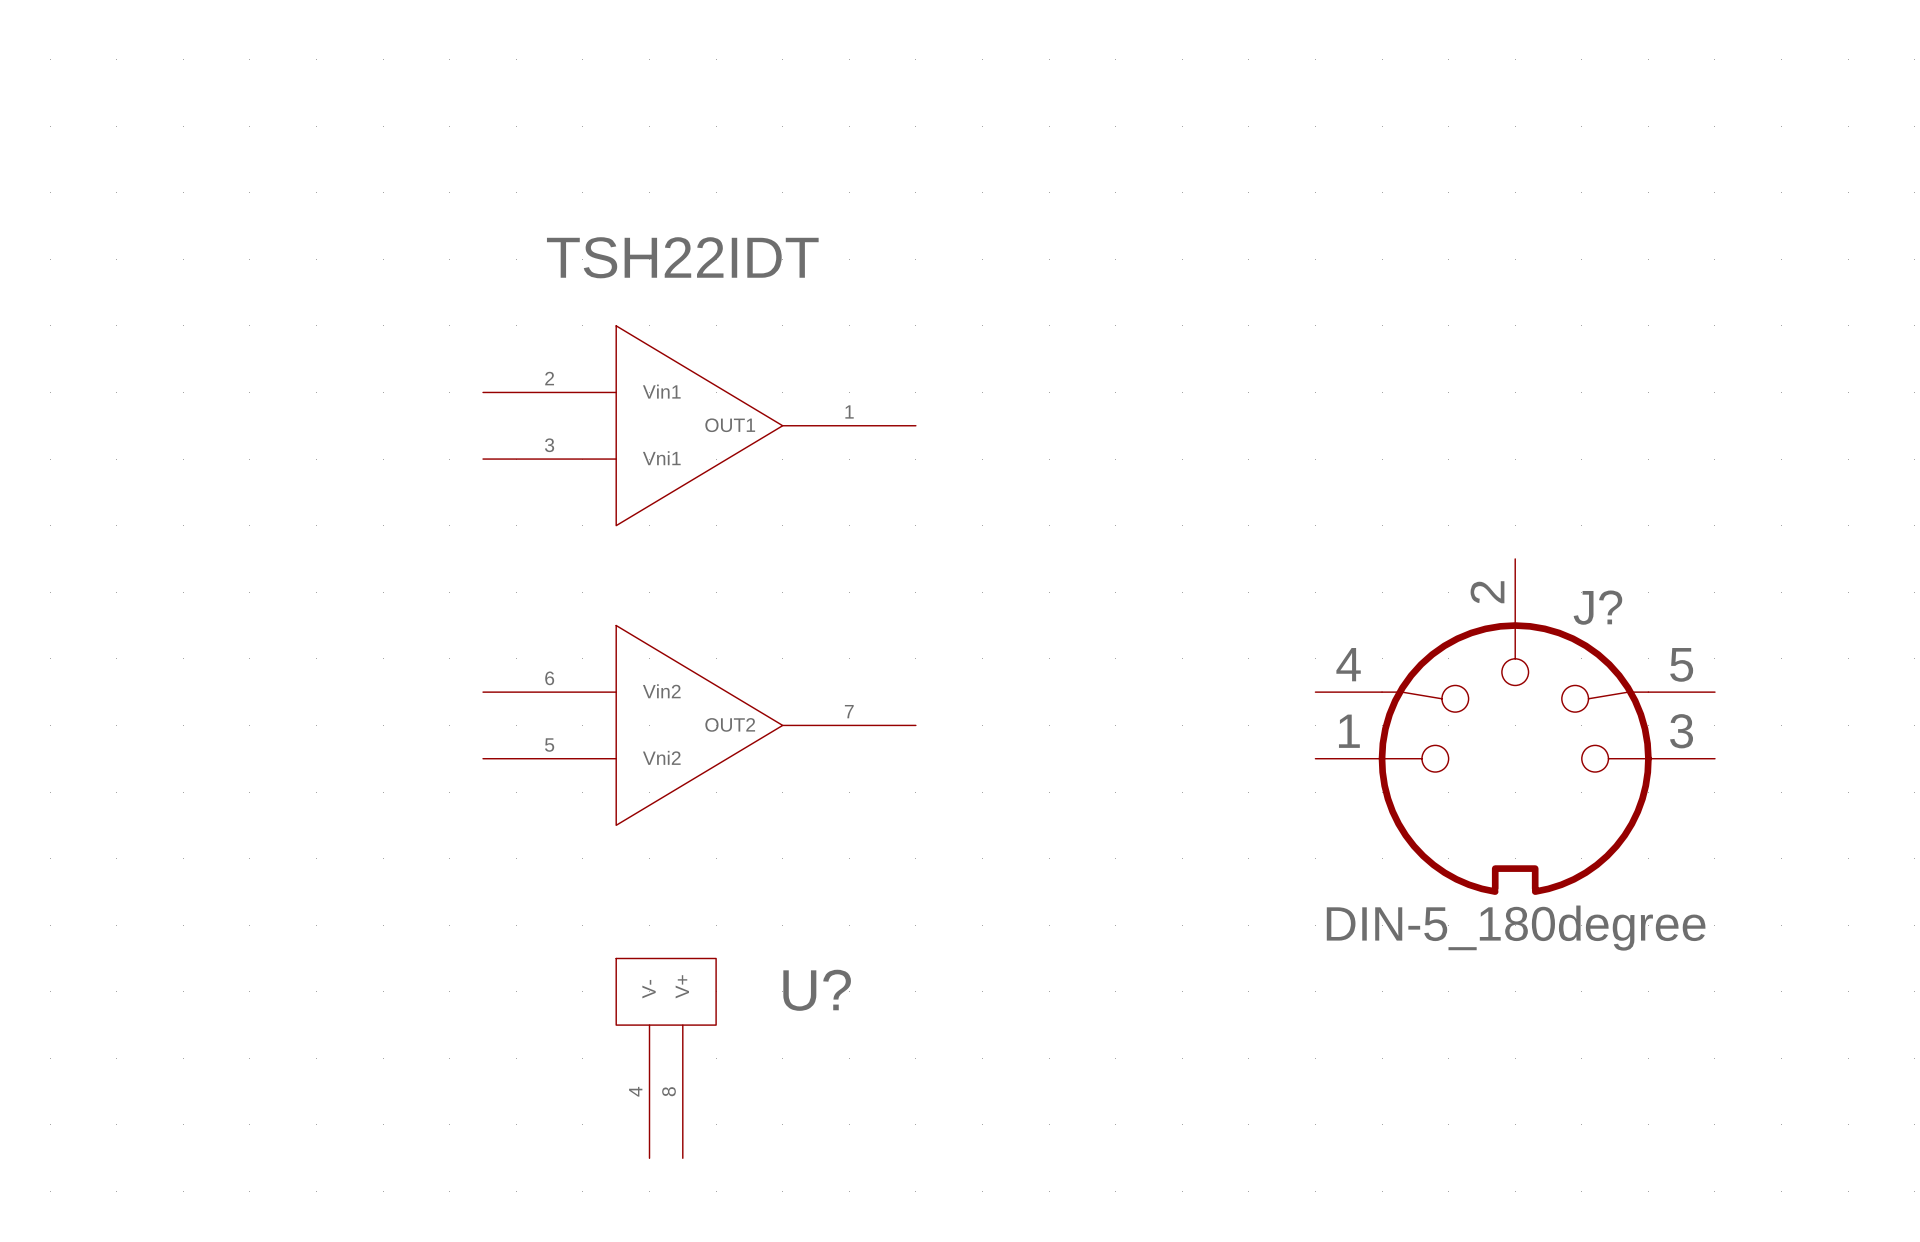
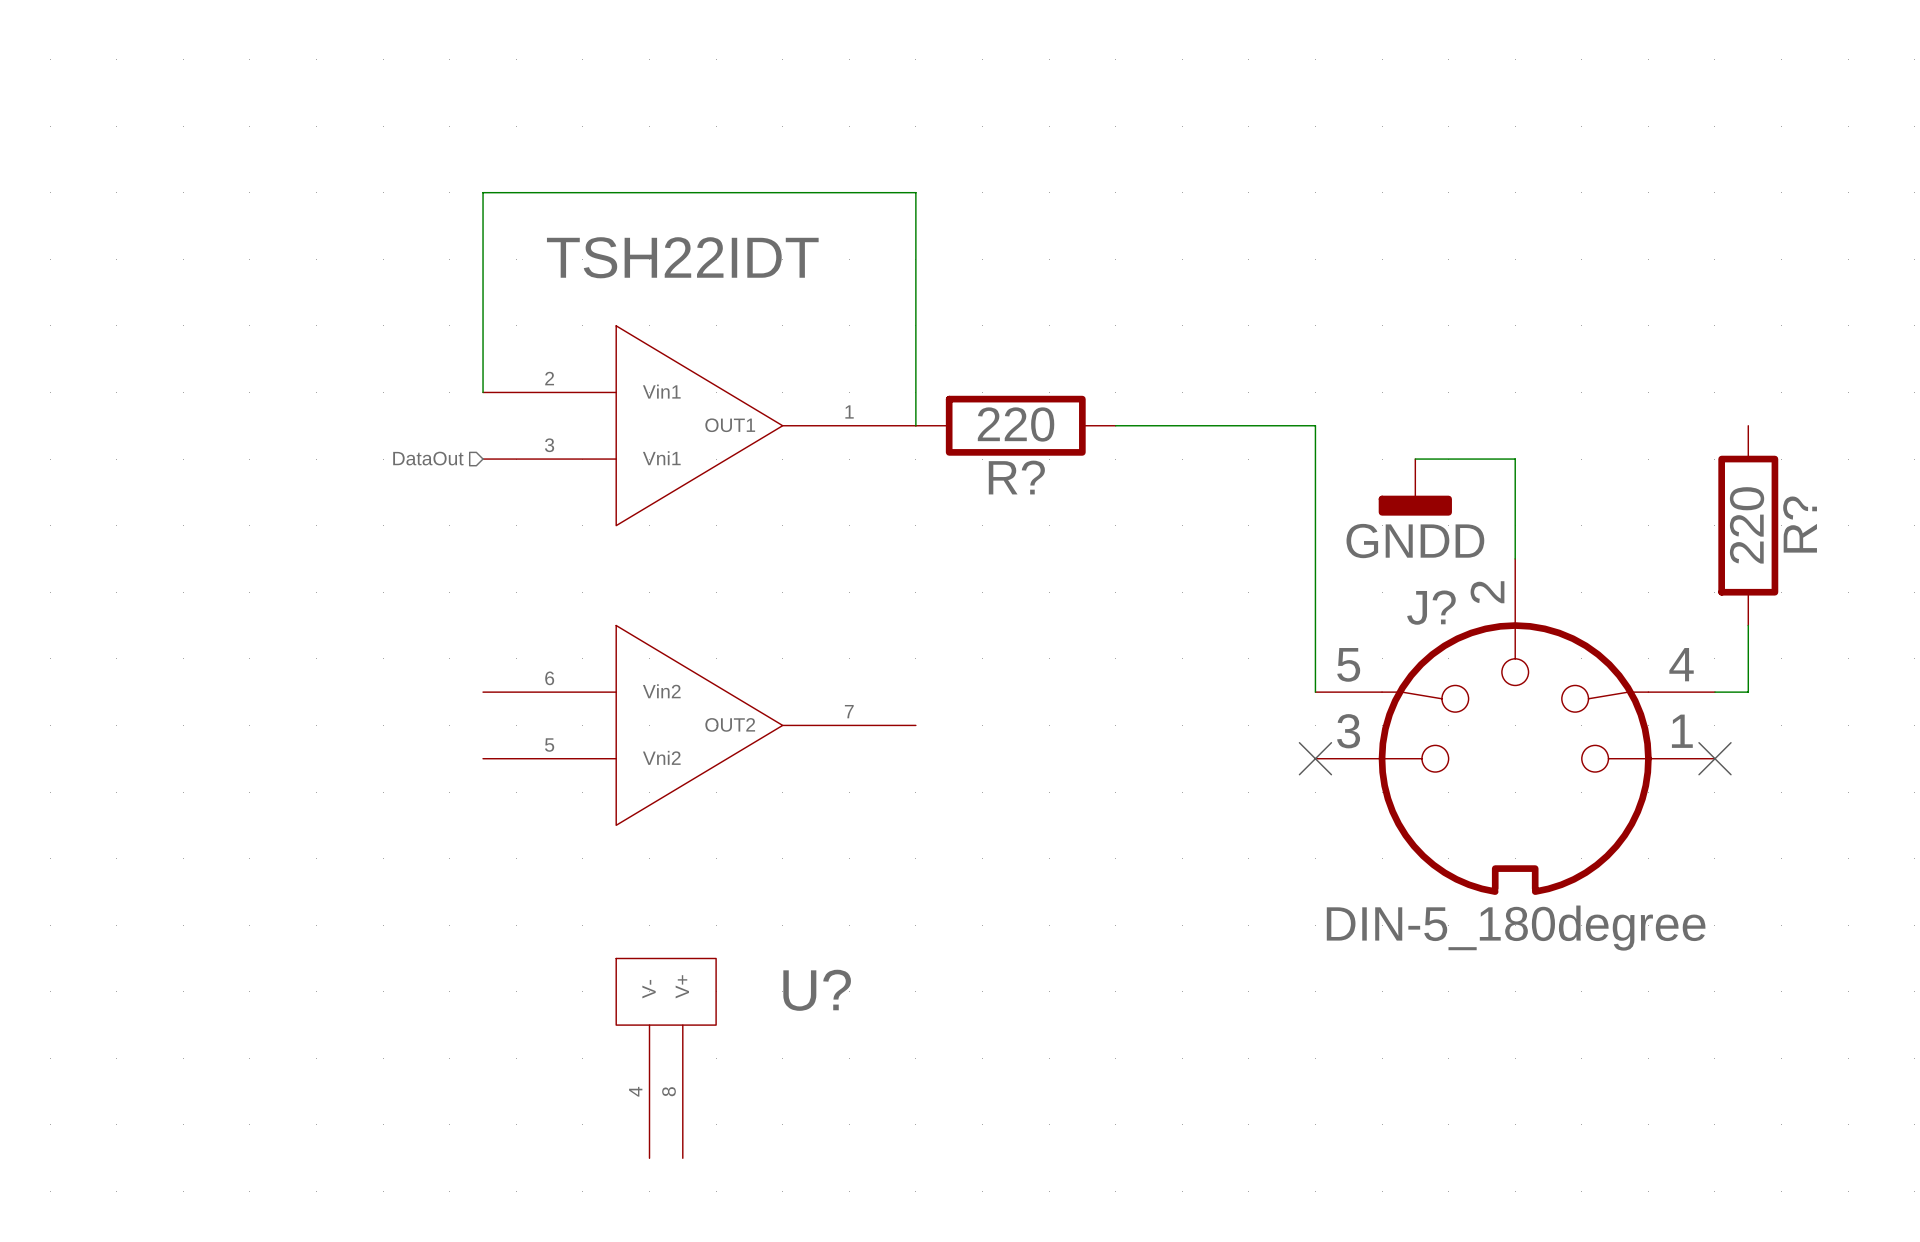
wire: none -> (483, 392) (483, 192) (915, 192) (915, 425)
R?: none -> 220 (1015, 425)
wire: none -> (1115, 425) (1315, 425) (1315, 692)
hierarchical label: none -> DataOut (428, 458)
wire: none -> (1415, 459) (1515, 459) (1515, 558)
power symbol: none -> GNDD (1415, 487)
R?: none -> 220 (1748, 525)
wire: none -> (1748, 625) (1748, 692) (1714, 692)
no-connect mark: none -> (1315, 758)
J? flip: as is (1515, 758) -> left-right (1515, 758)
no-connect mark: none -> (1714, 758)

